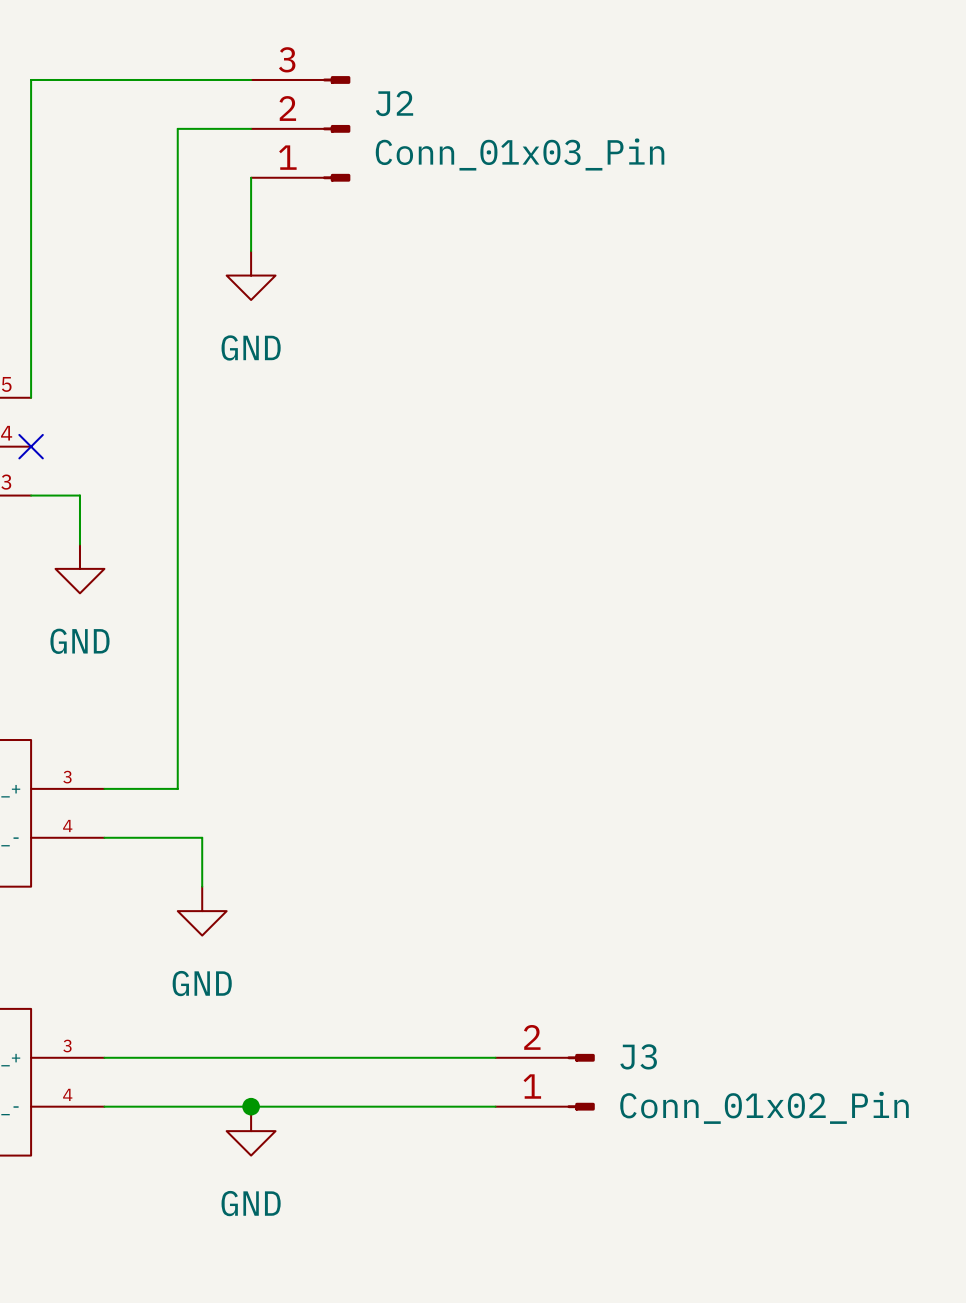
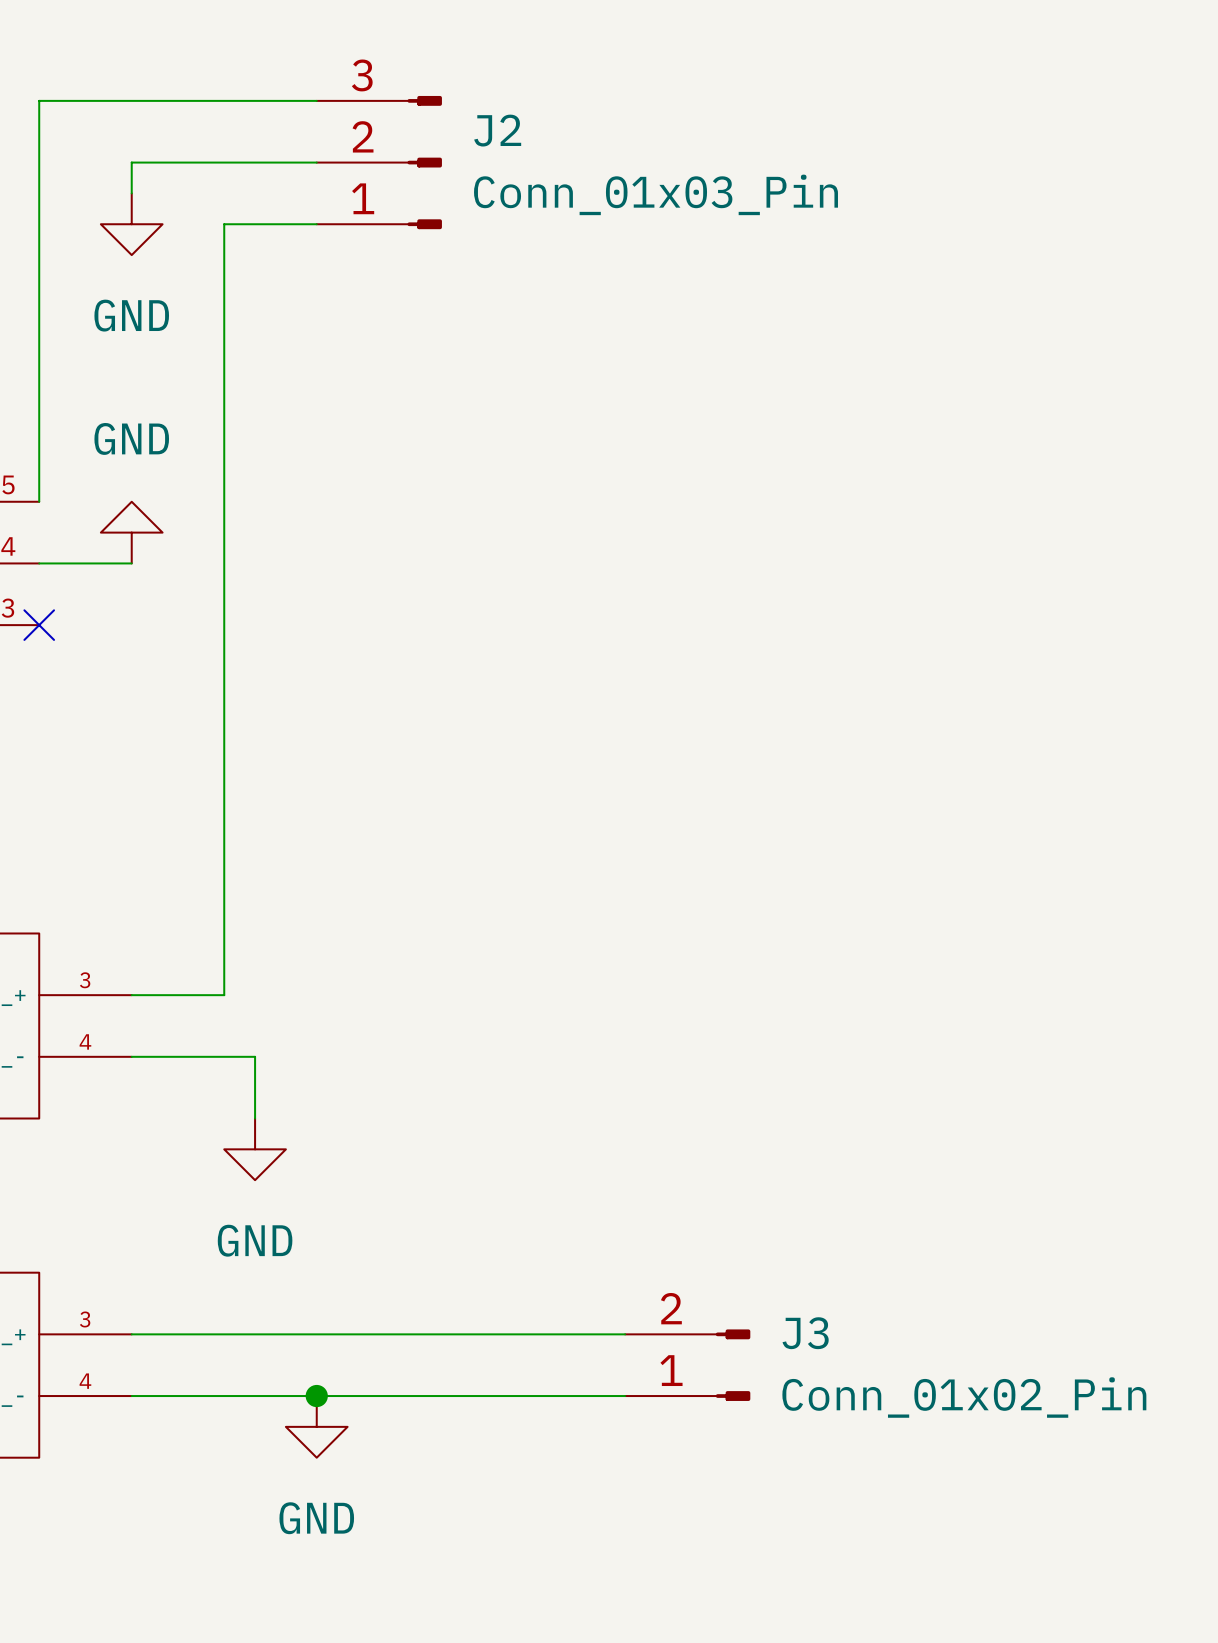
wire: (177, 128) (177, 177) -> (224, 162) (131, 162) (131, 193)
power symbol: none -> GND (131, 224)
wire: (251, 177) (251, 251) -> (316, 224) (224, 224)
power symbol: GND (251, 275) -> none
power symbol: none -> GND (131, 532)
wire: none -> (39, 563) (131, 563)
no-connect mark position: (31, 446) -> (39, 625)
wire: (31, 495) (79, 495) (79, 544) -> none
power symbol: GND (79, 568) -> none

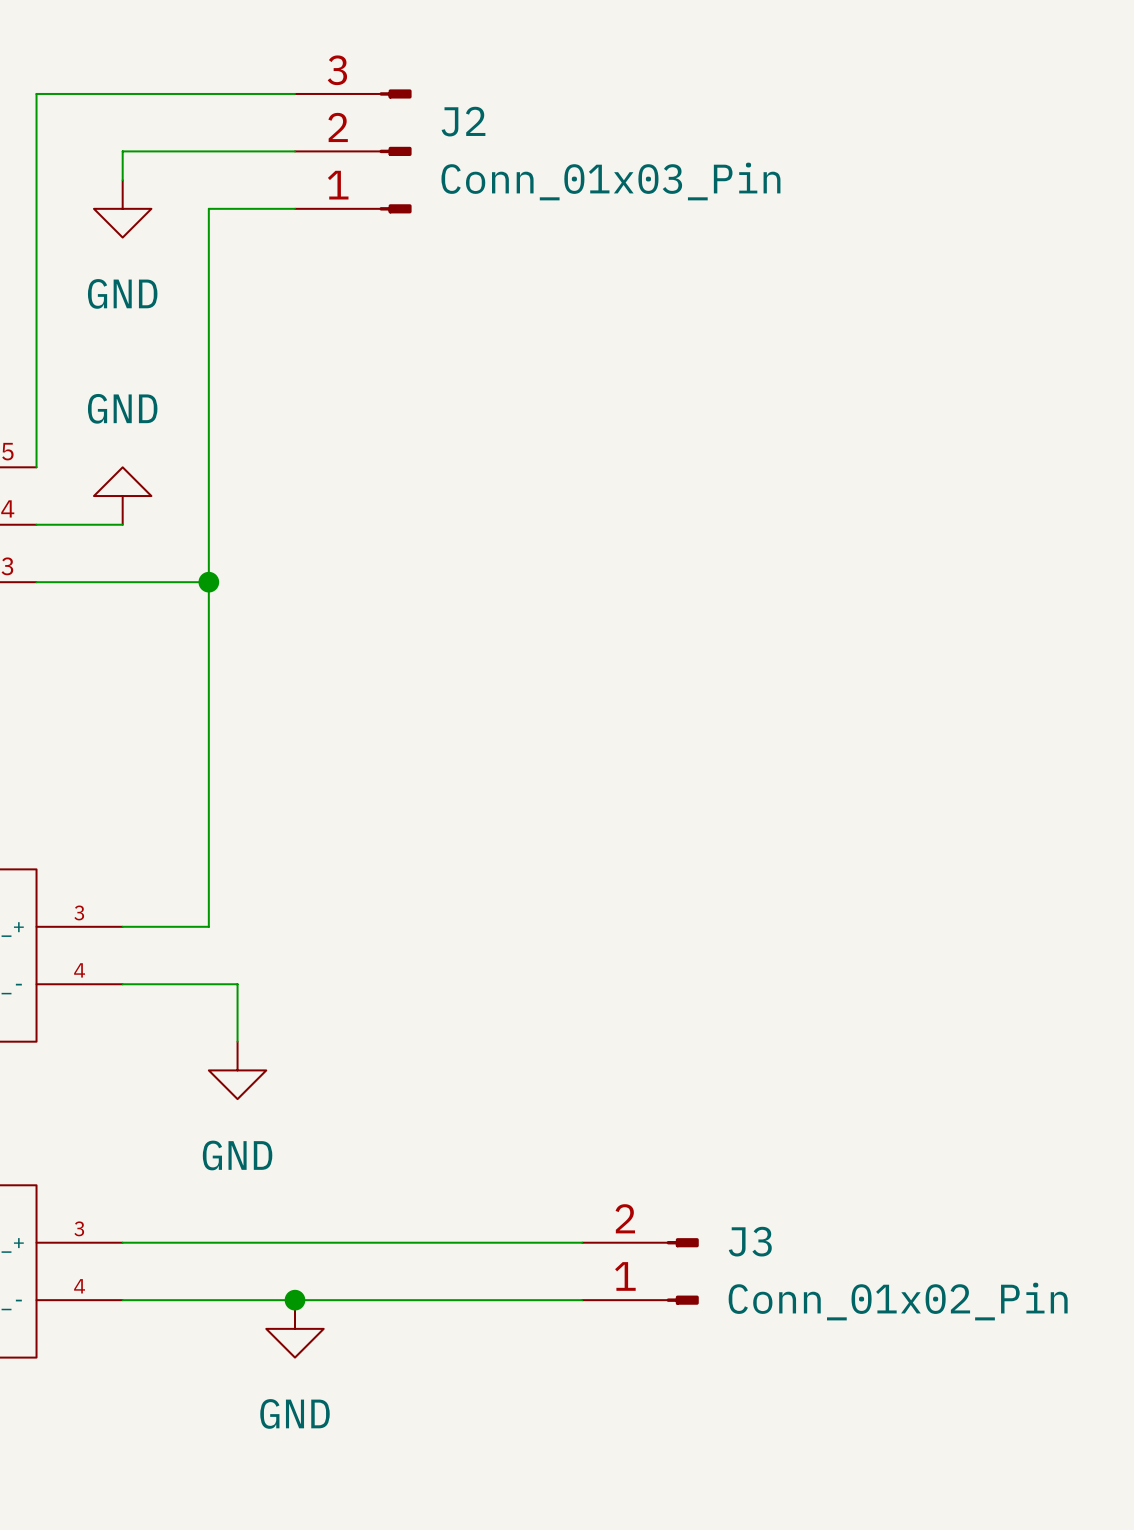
wire: none -> (36, 582) (208, 582)
no-connect mark: (39, 625) -> none
junction: none -> (208, 582)

